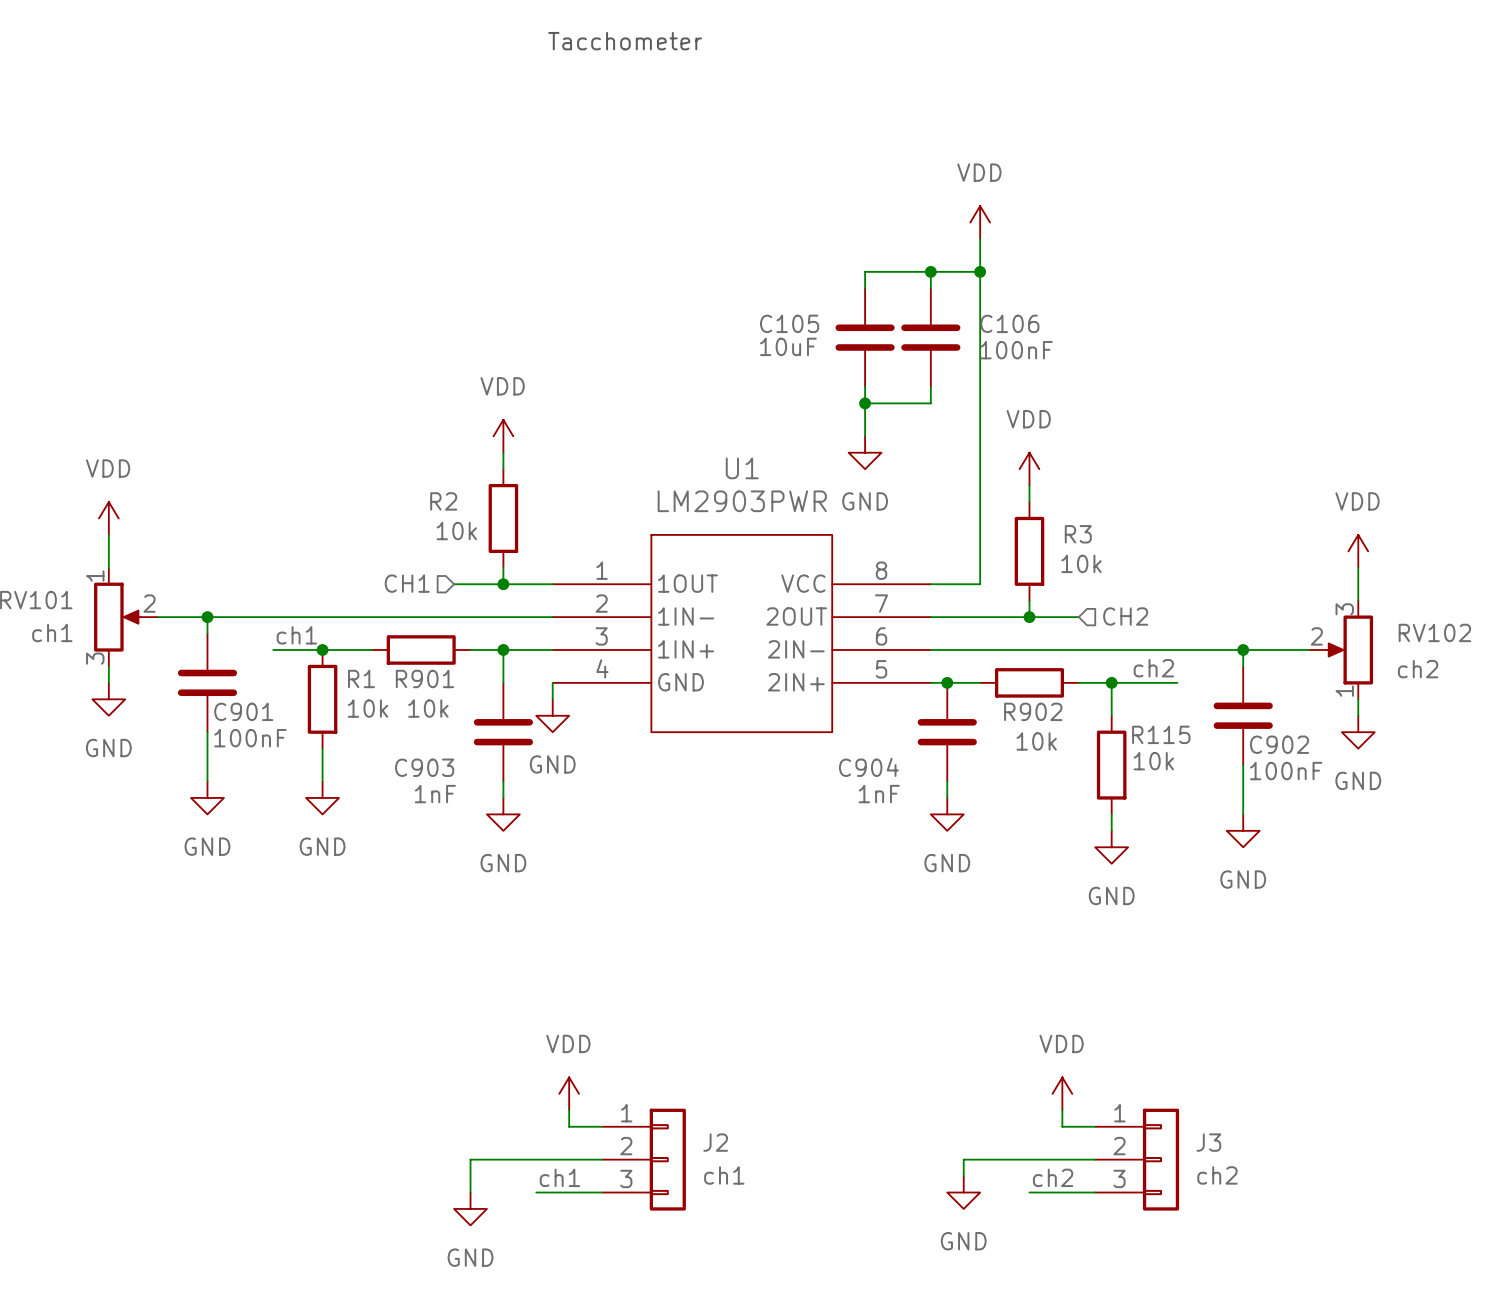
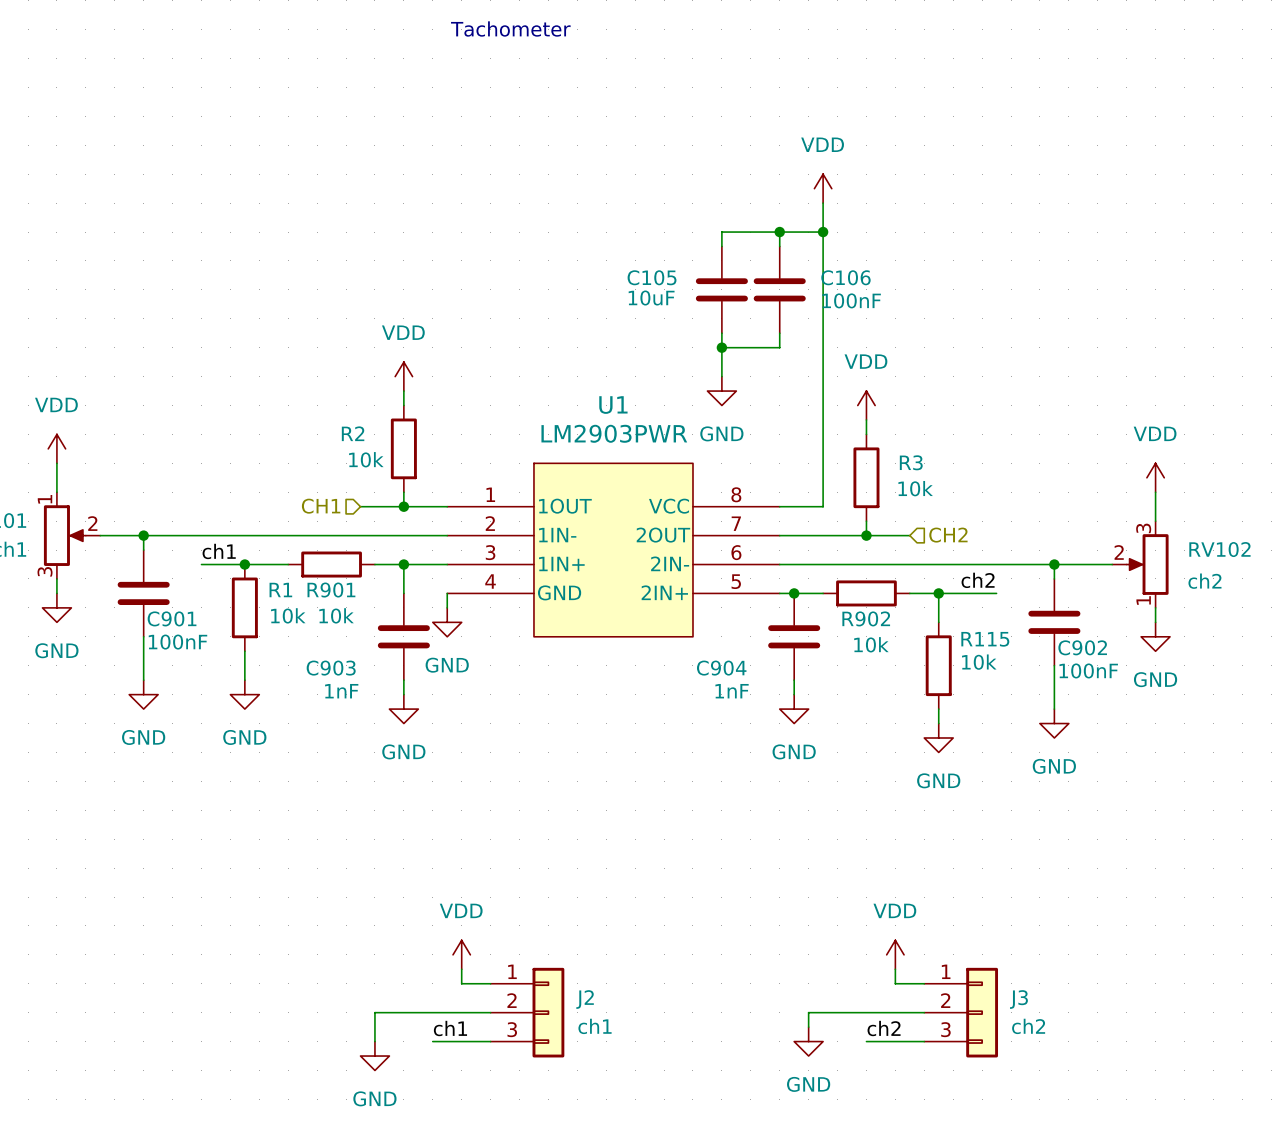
text: Tacchometer (625, 41) -> Tachometer (510, 29)

